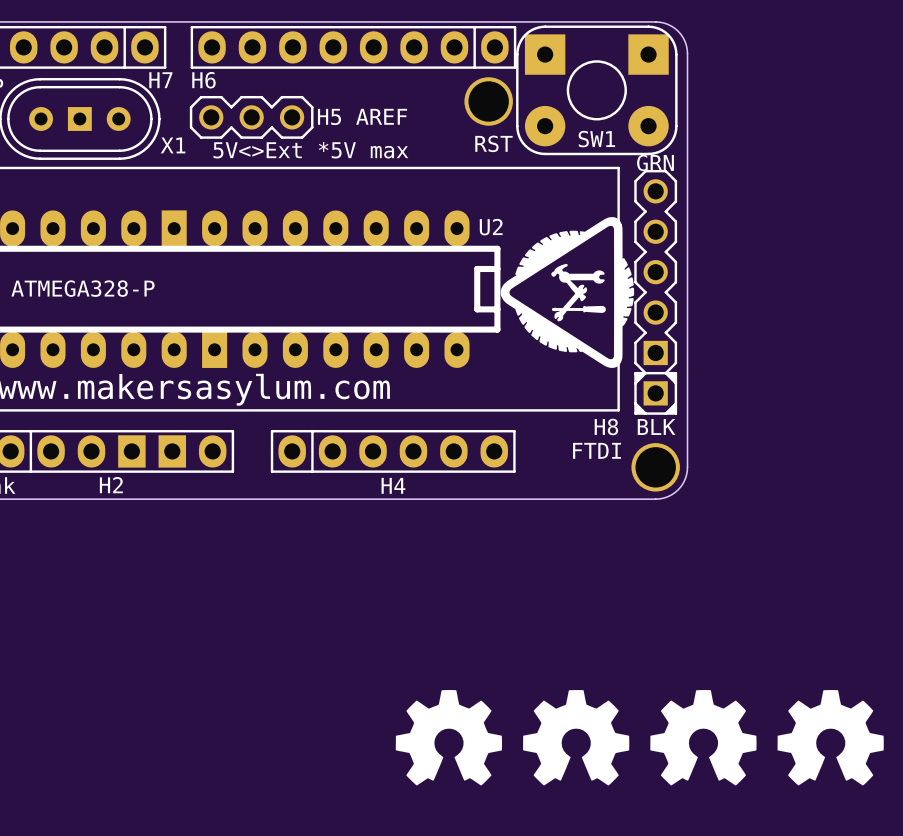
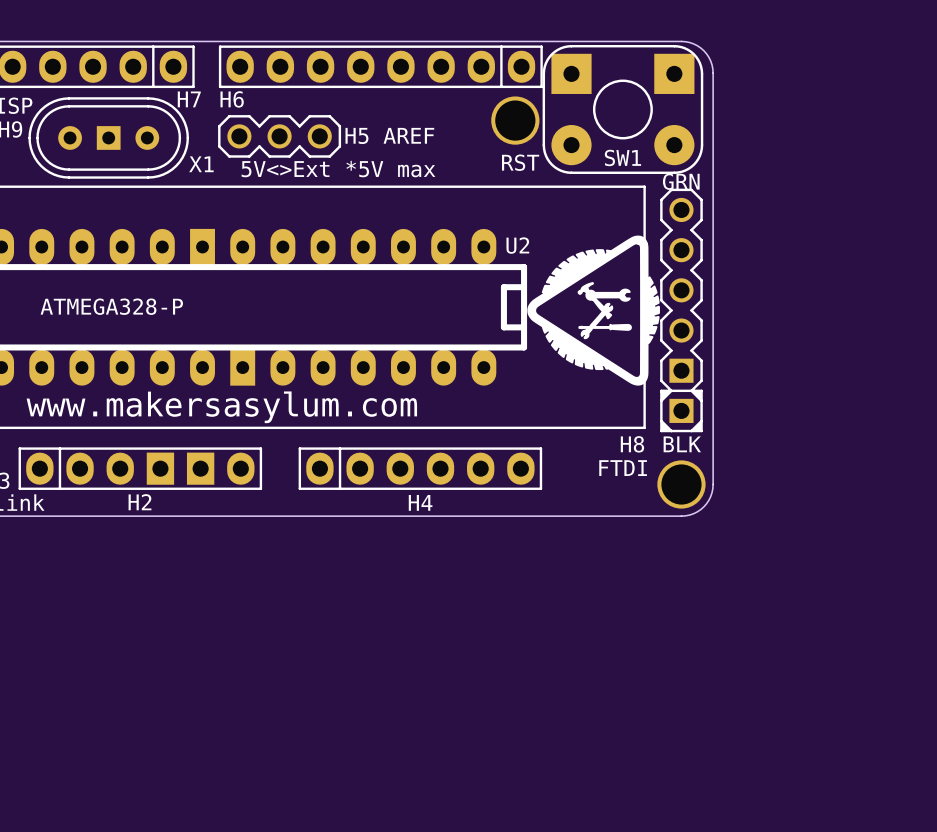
drawing: [395, 690, 503, 786] -> none
drawing: [523, 690, 630, 786] -> none
drawing: [650, 690, 757, 786] -> none
drawing: [777, 690, 884, 786] -> none

